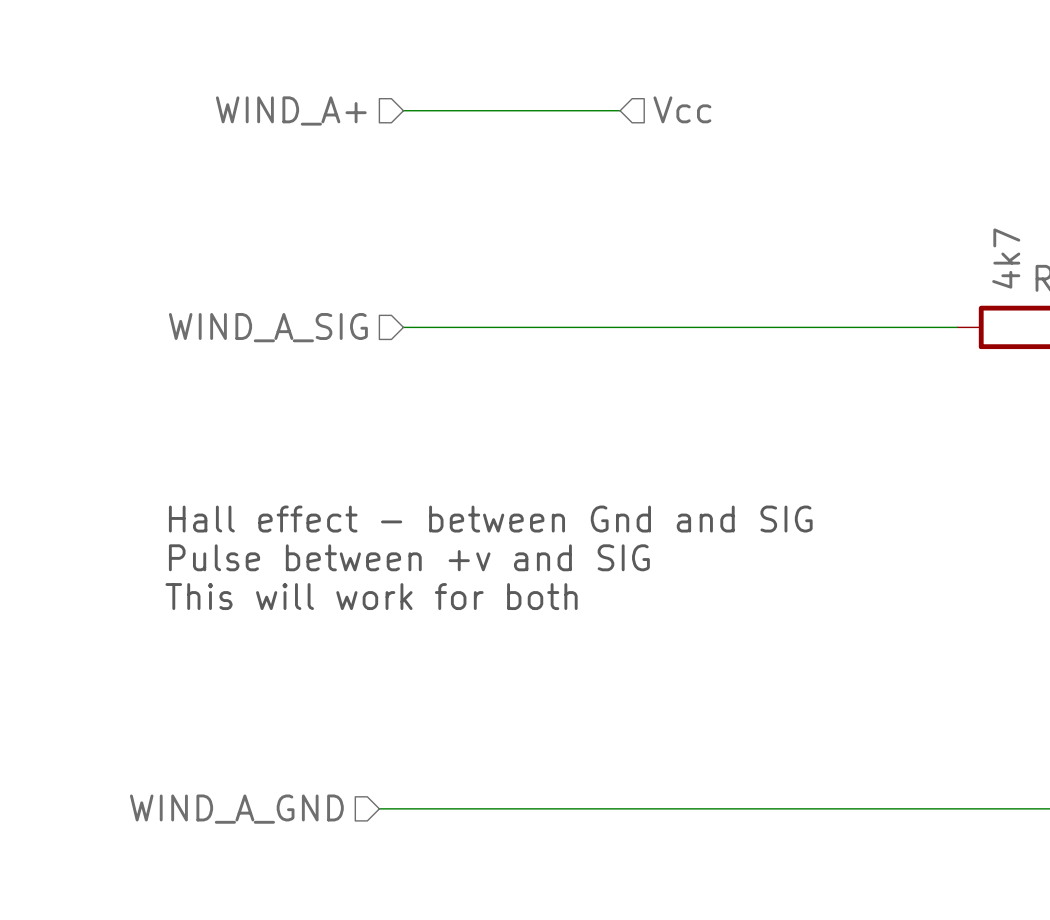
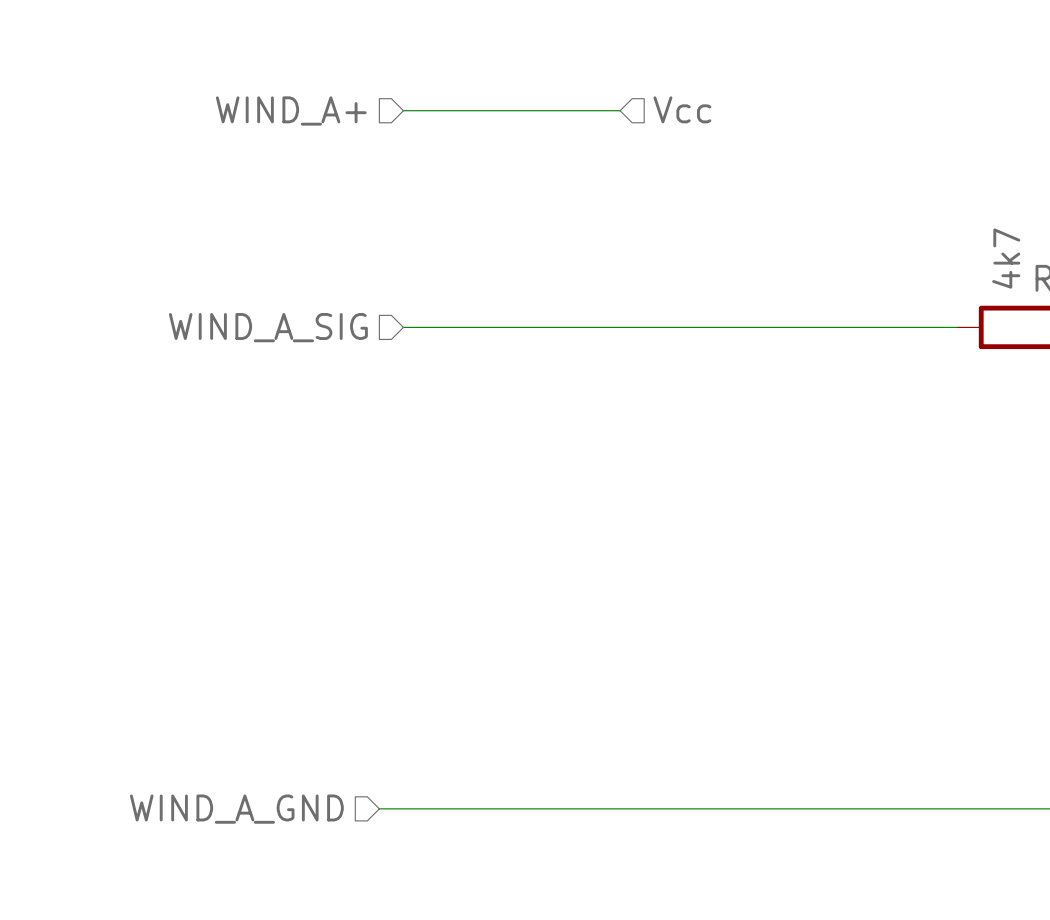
text: Hall effect - between Gnd and SIG (490, 519) -> none
text: Pulse between +v and SIG (409, 557) -> none
text: This will work for both (371, 596) -> none

